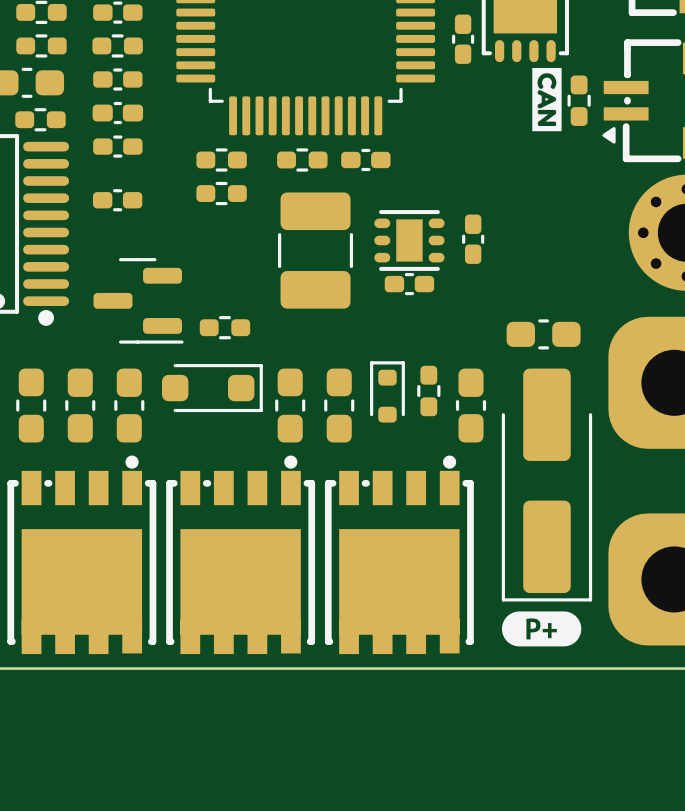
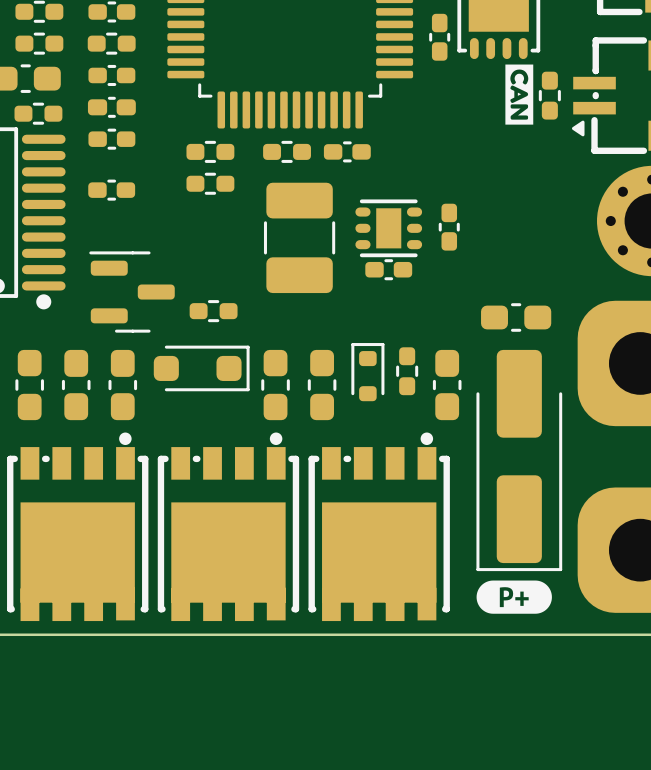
part rotation: 0° (138, 300) -> 180° (132, 292)

